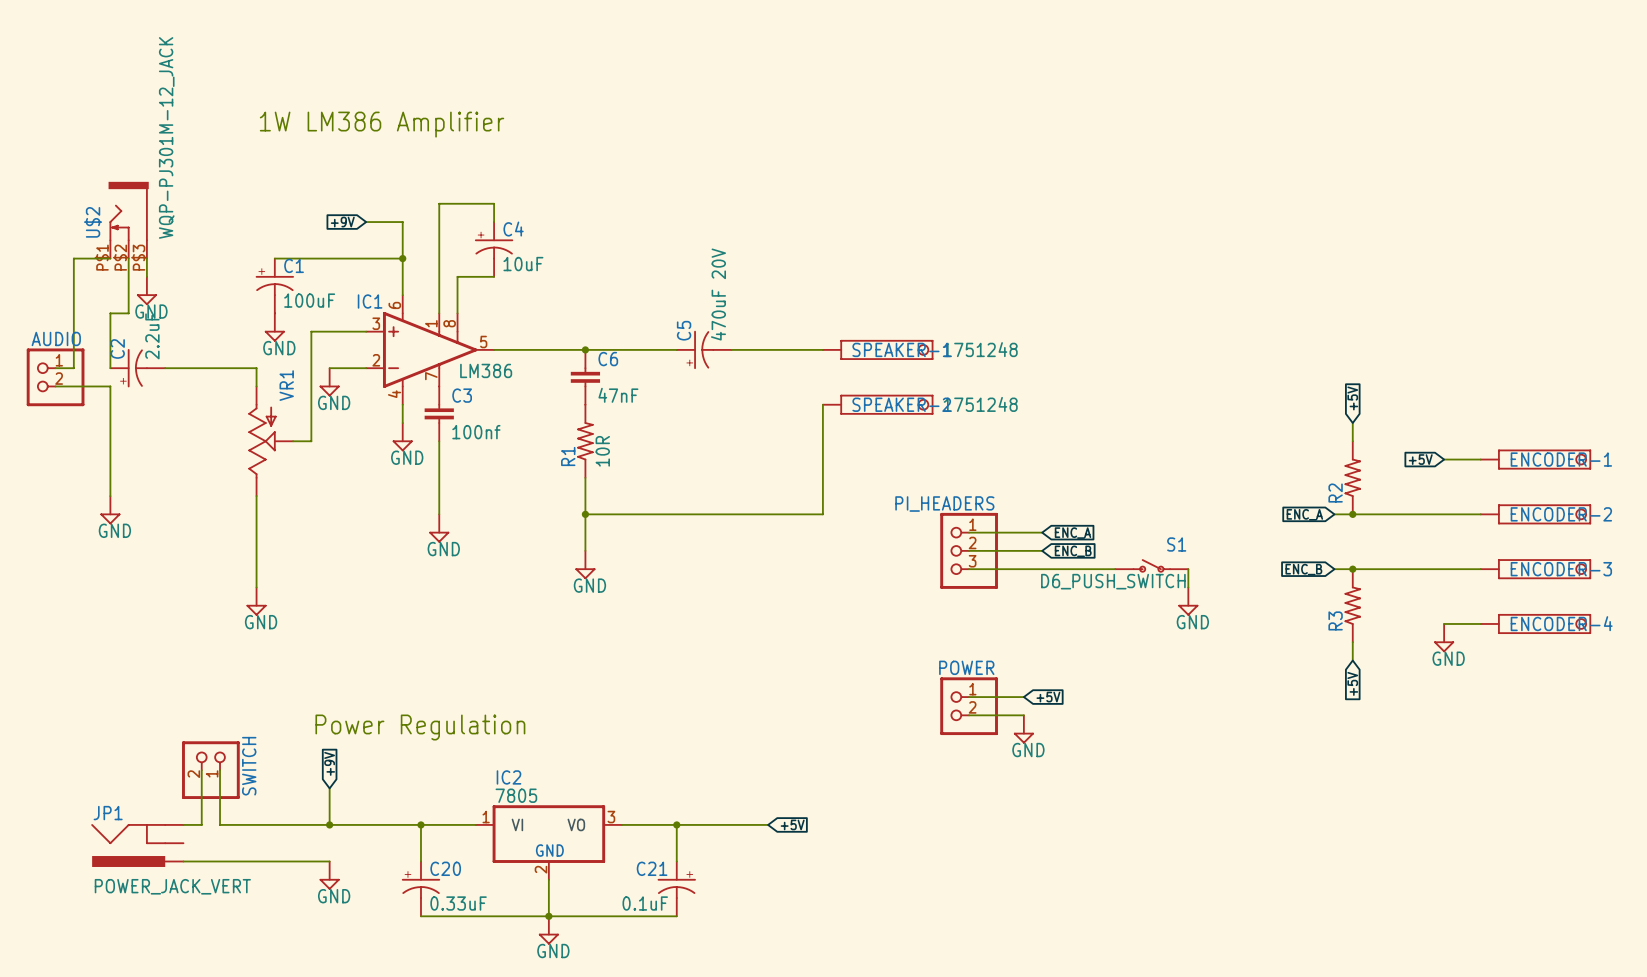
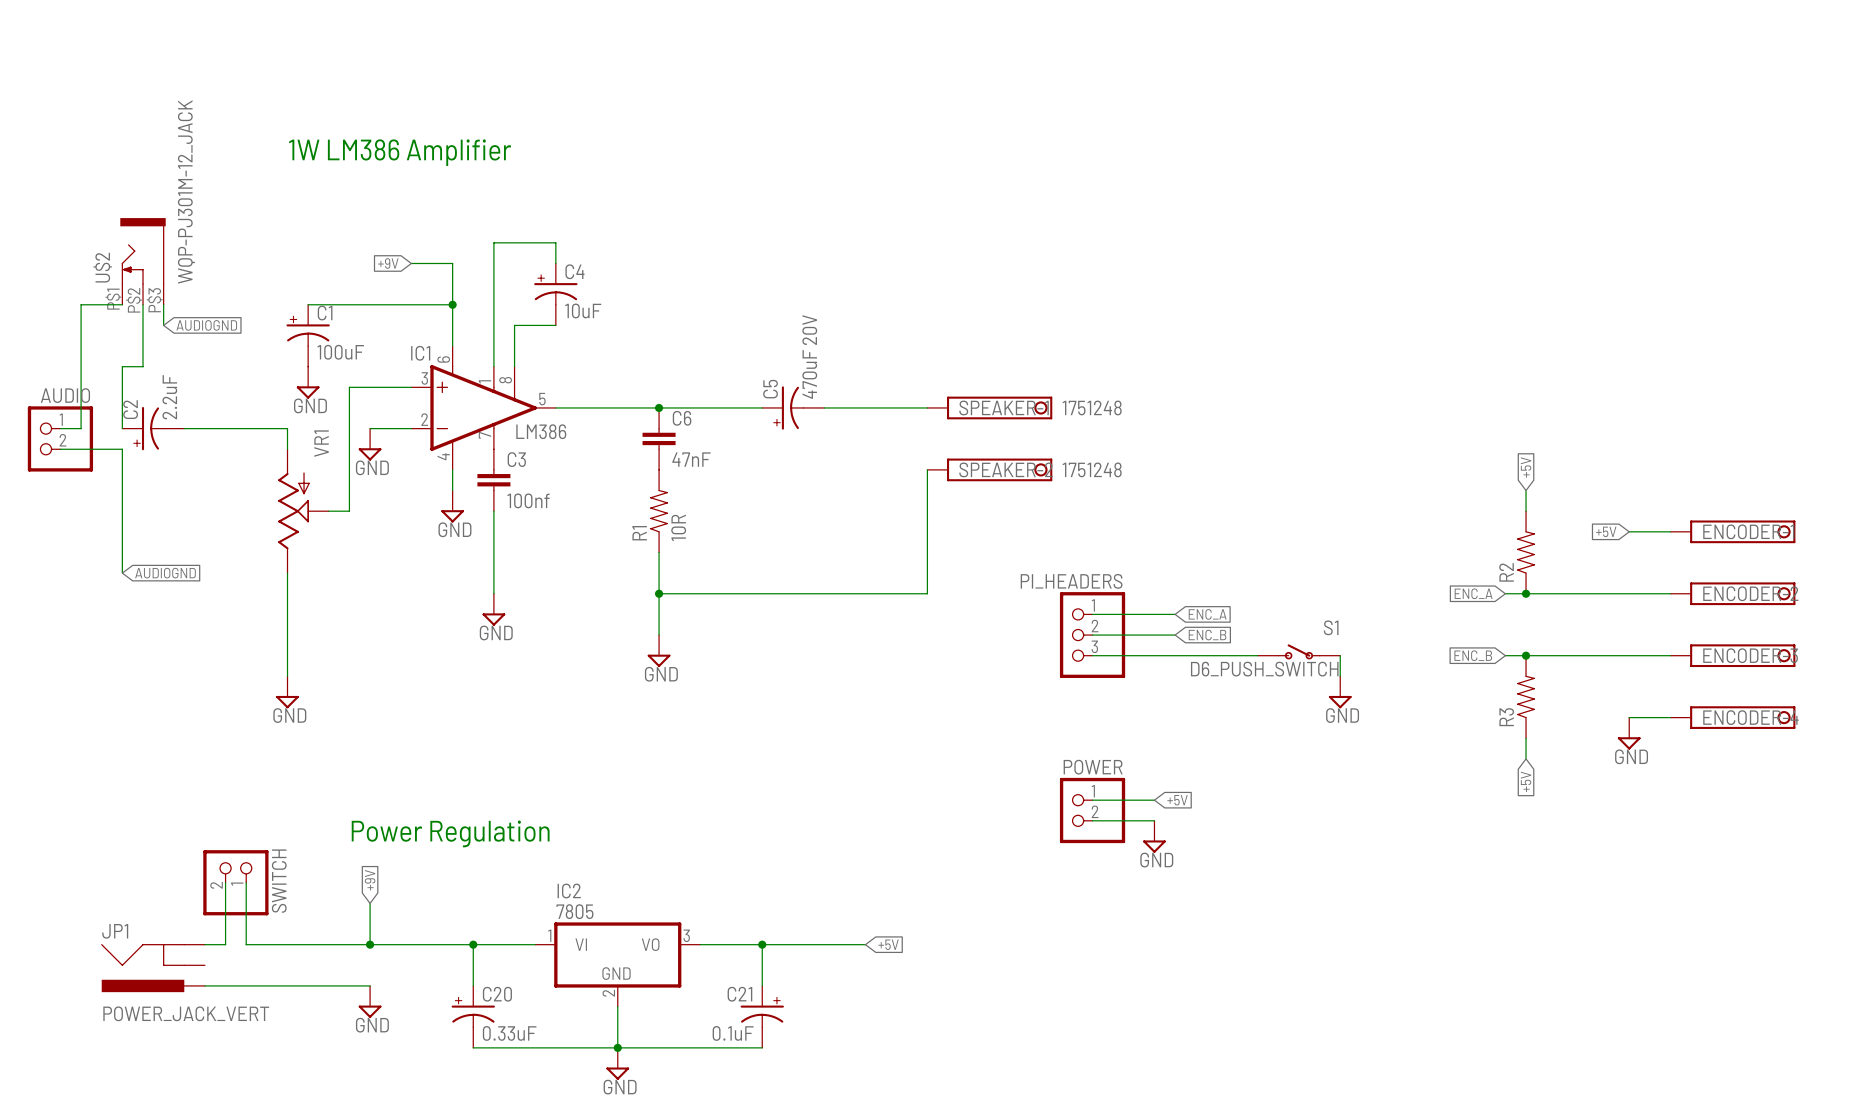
global label: none -> AUDIOGND (206, 325)
power symbol: GND (146, 291) -> none
global label: none -> AUDIOGND (165, 573)
power symbol: GND (110, 510) -> none

